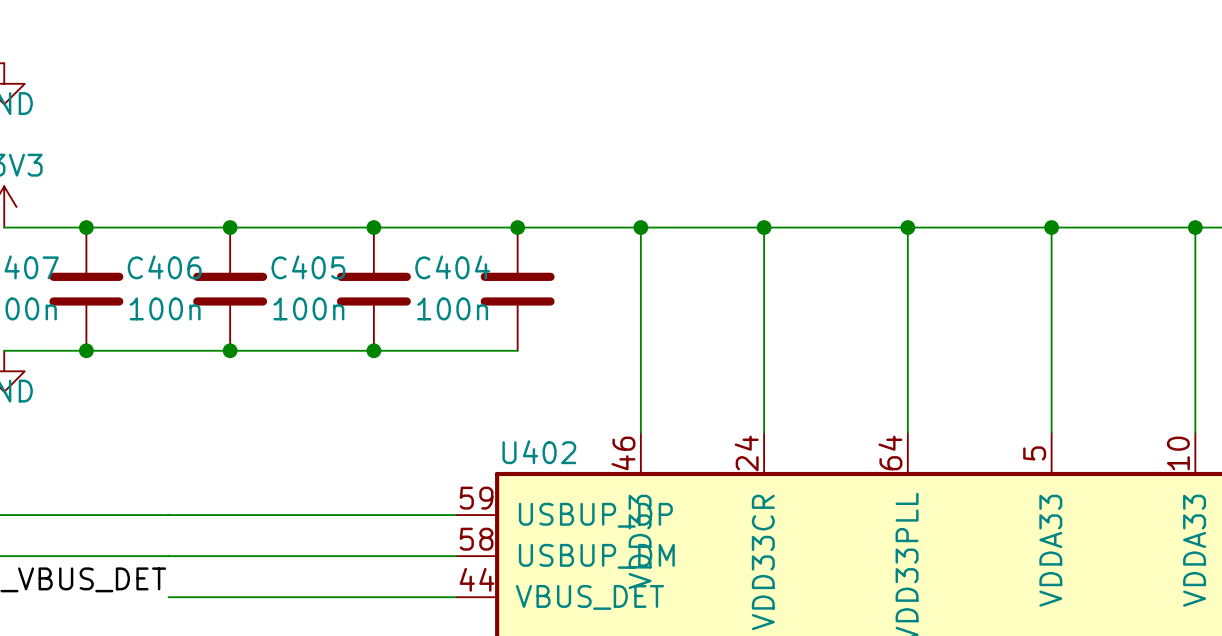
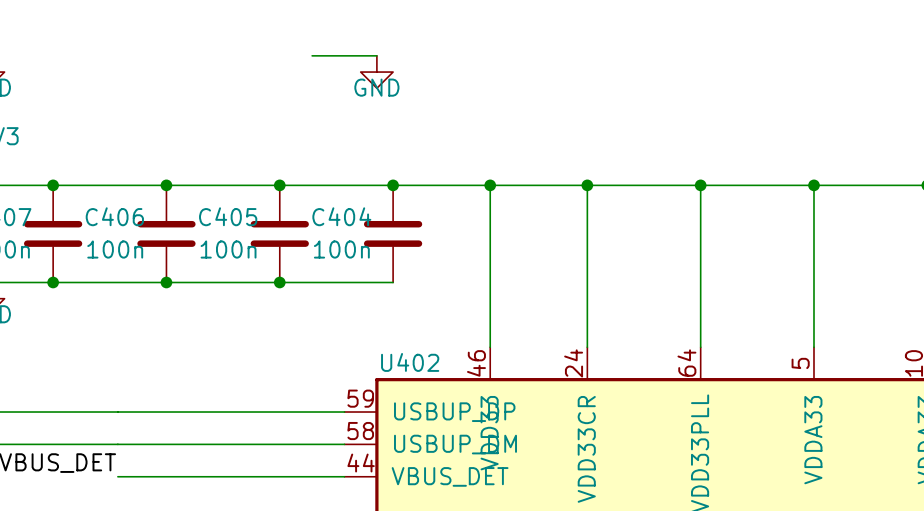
wire: none -> (312, 55) (376, 55)
power symbol: none -> GND (376, 72)

